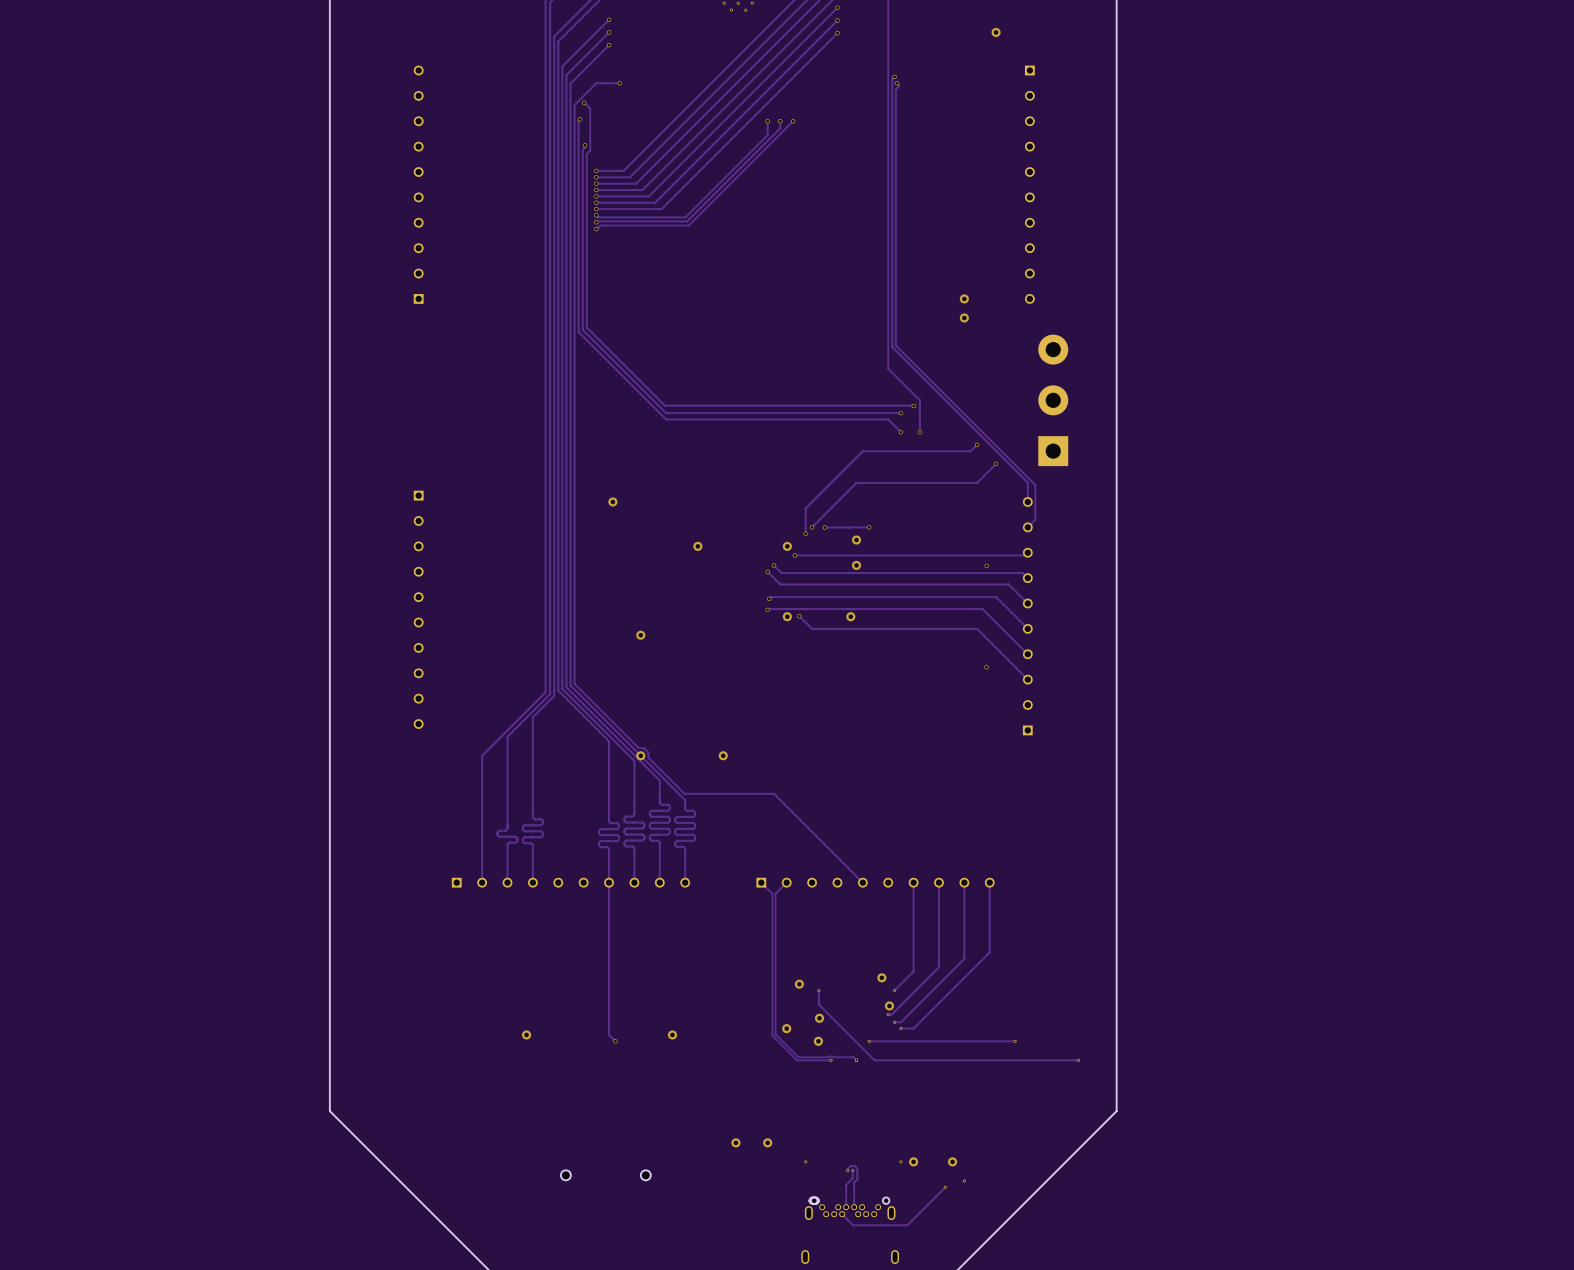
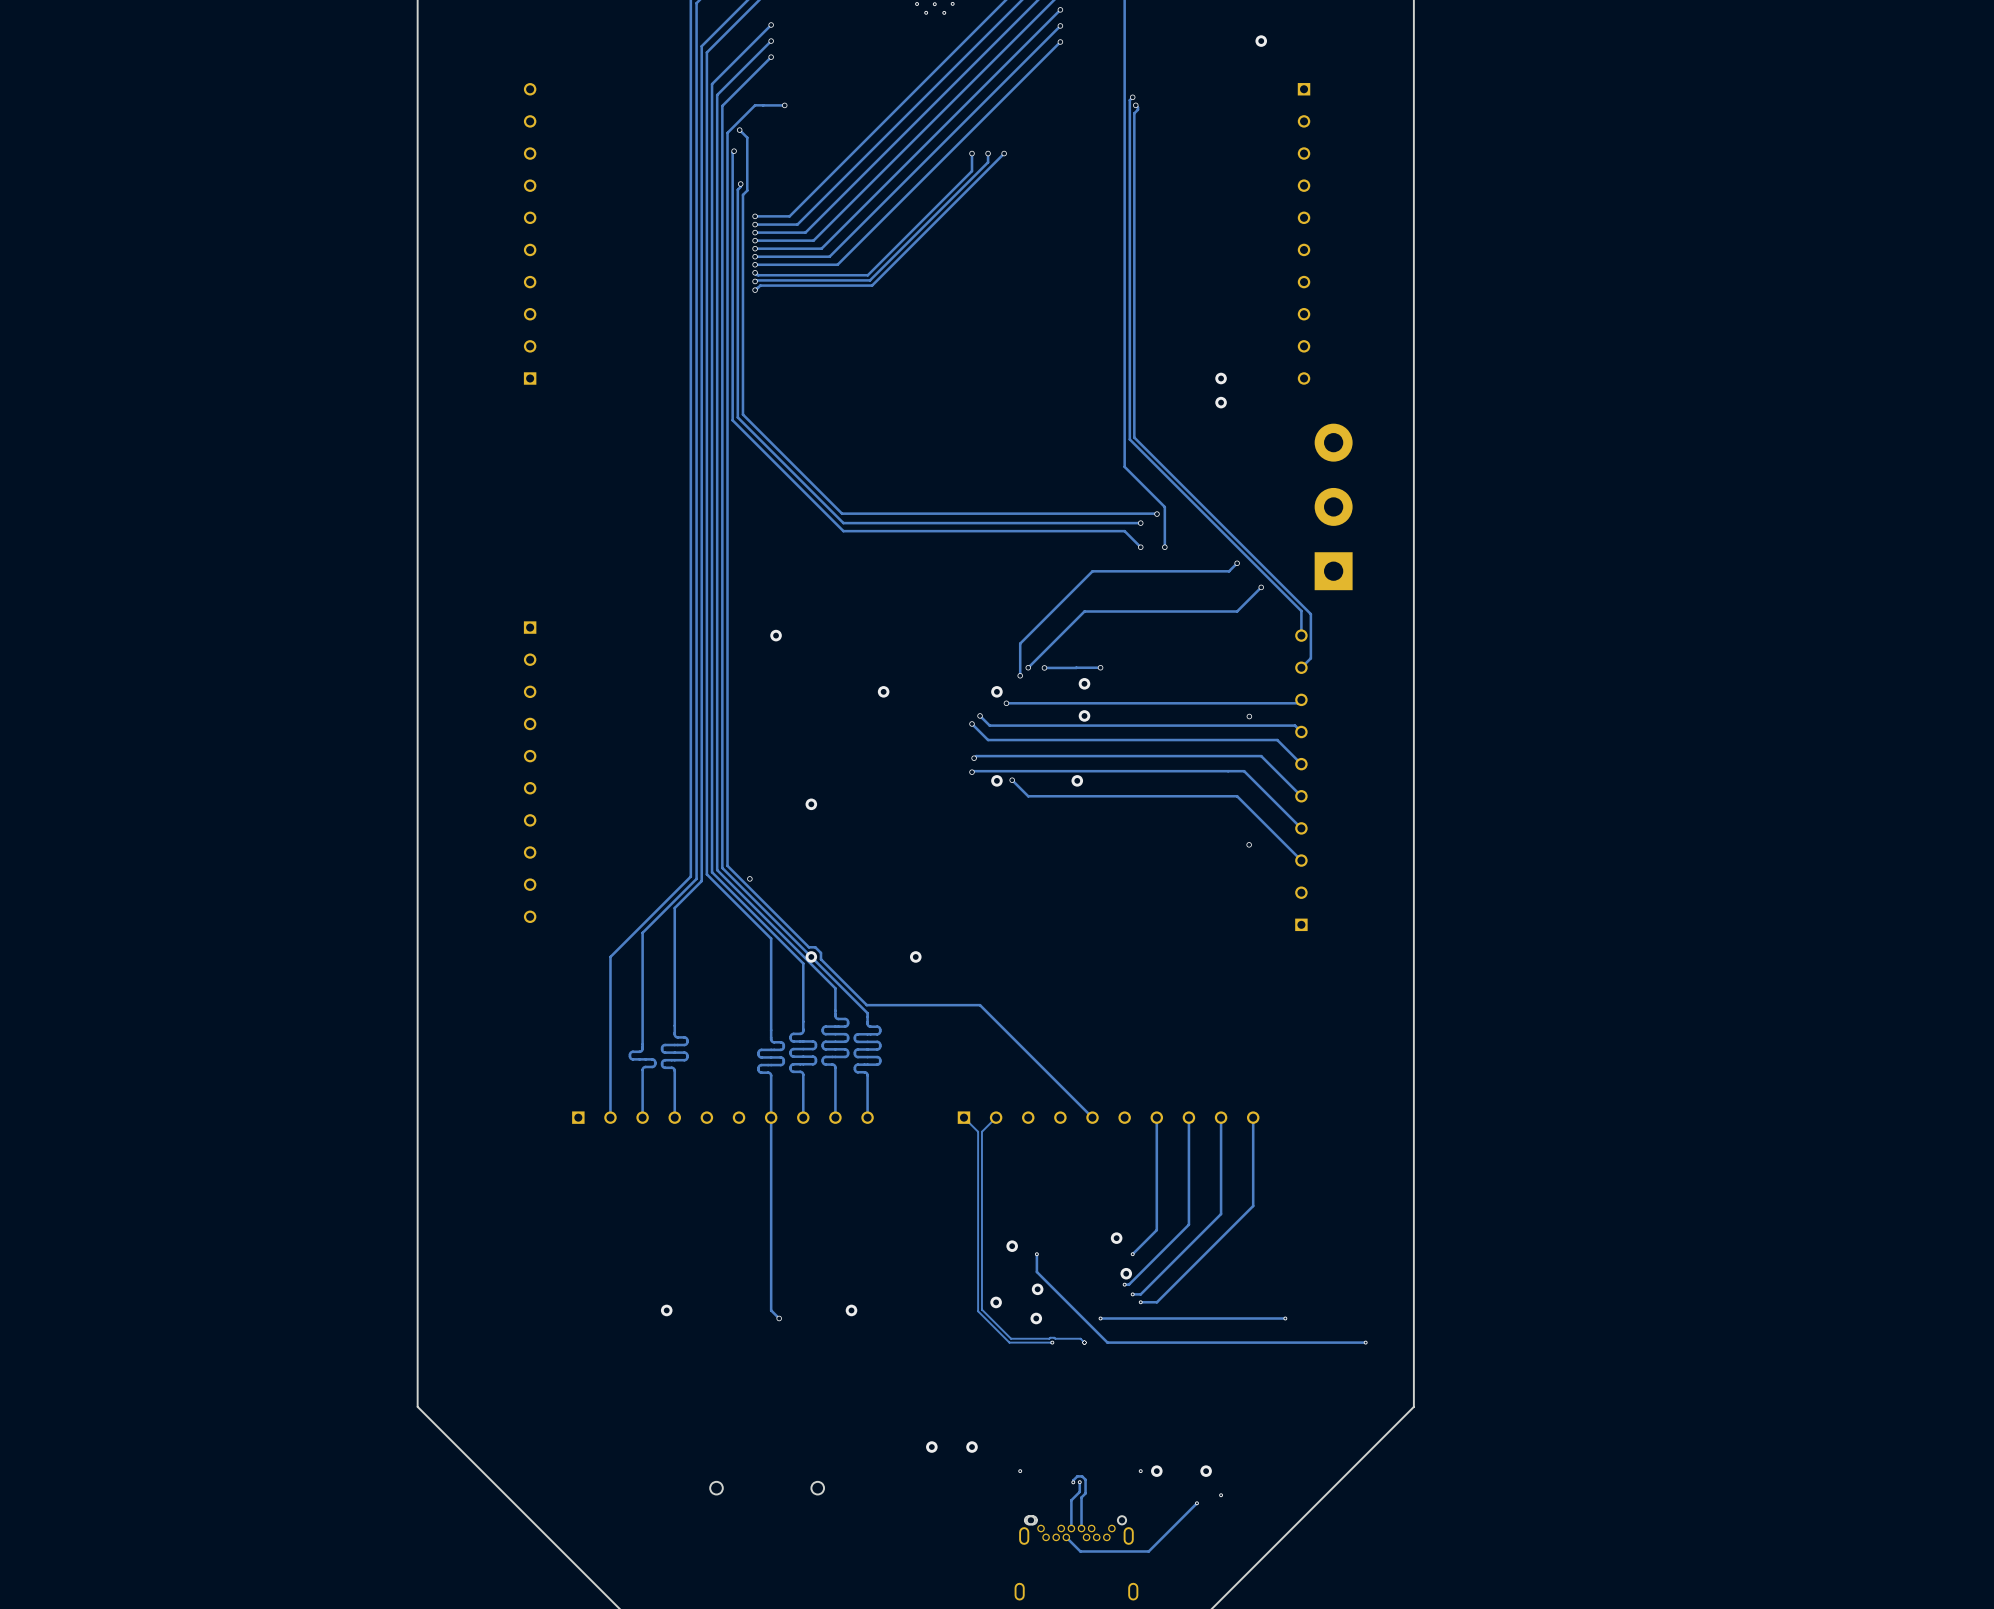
via: none -> (749, 878)

